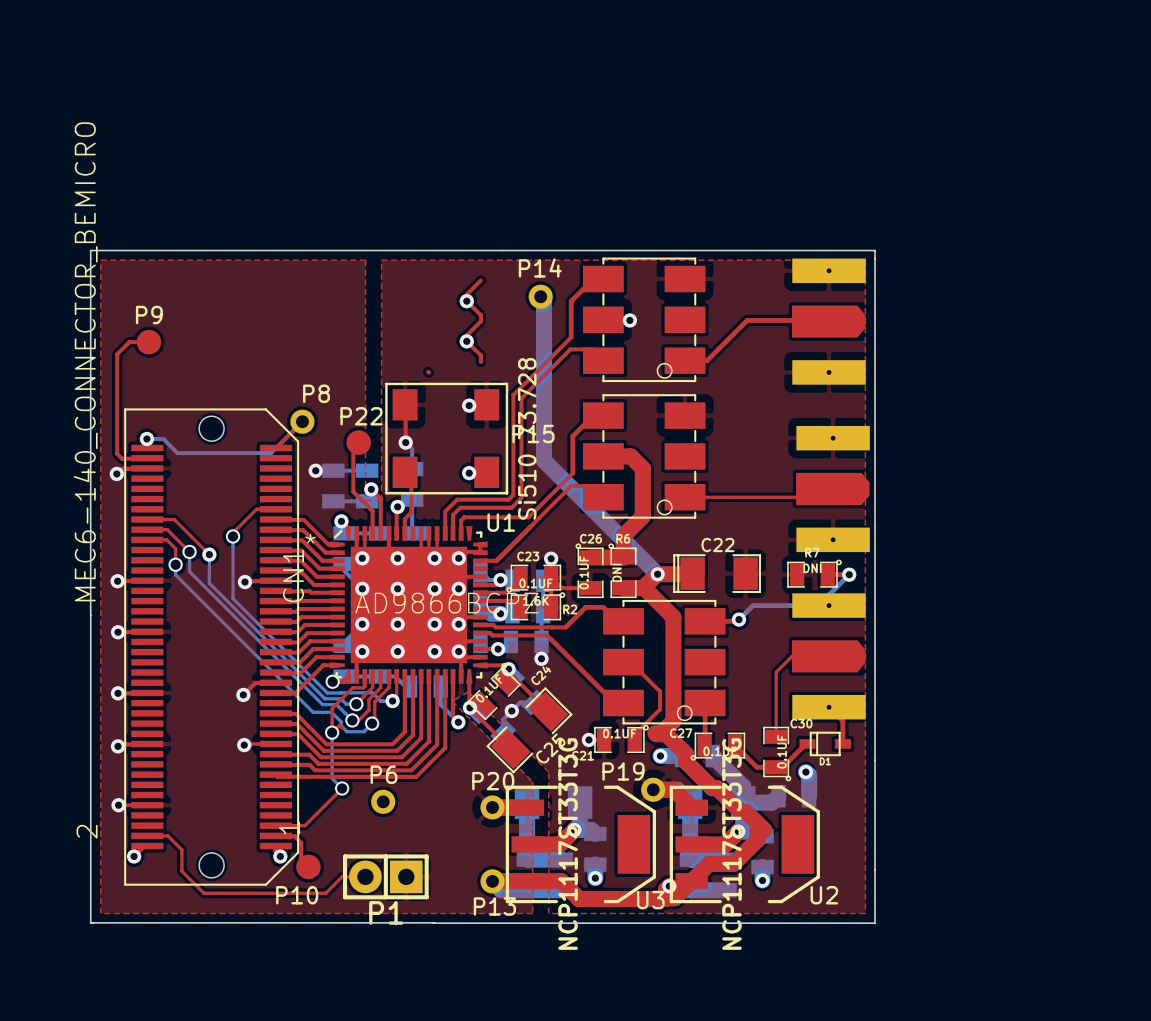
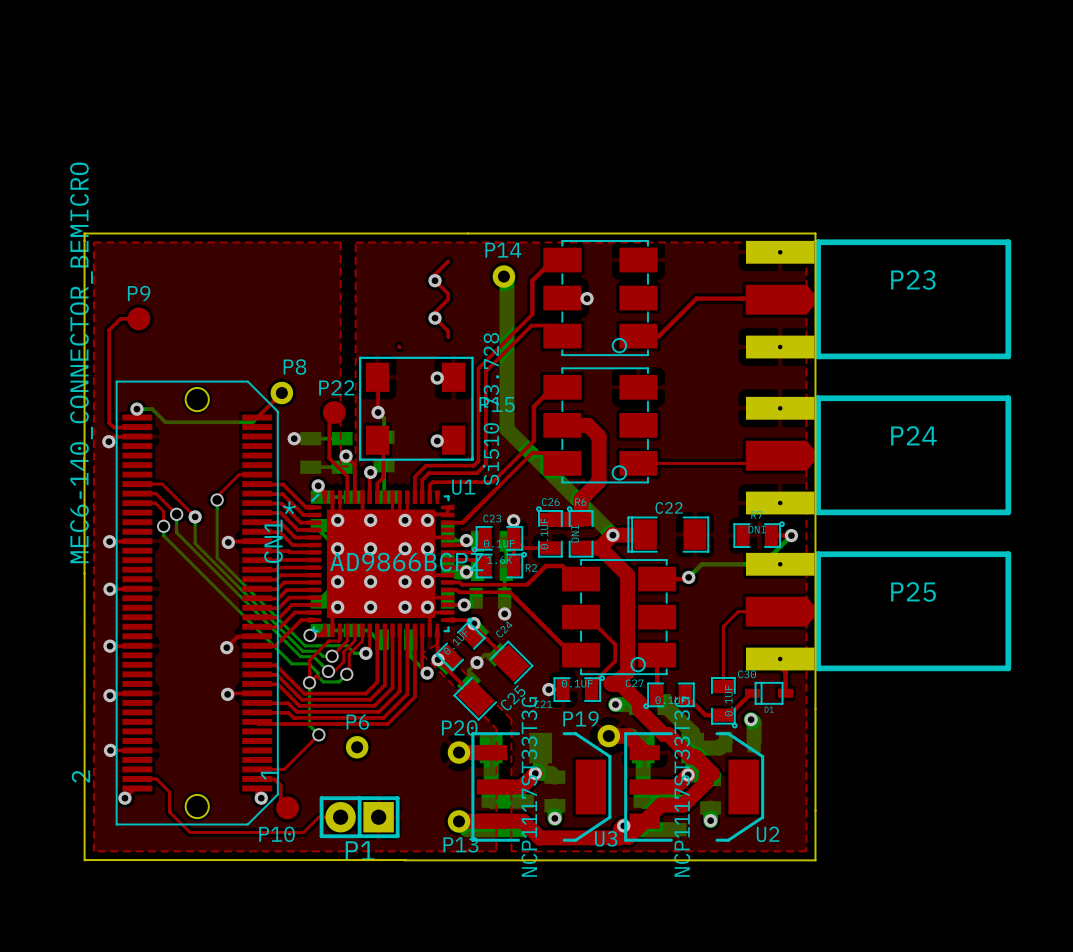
P23 side: bottom (828, 321) -> top (878, 299)
P24 side: bottom (832, 489) -> top (878, 455)
P25 side: bottom (828, 656) -> top (878, 611)

